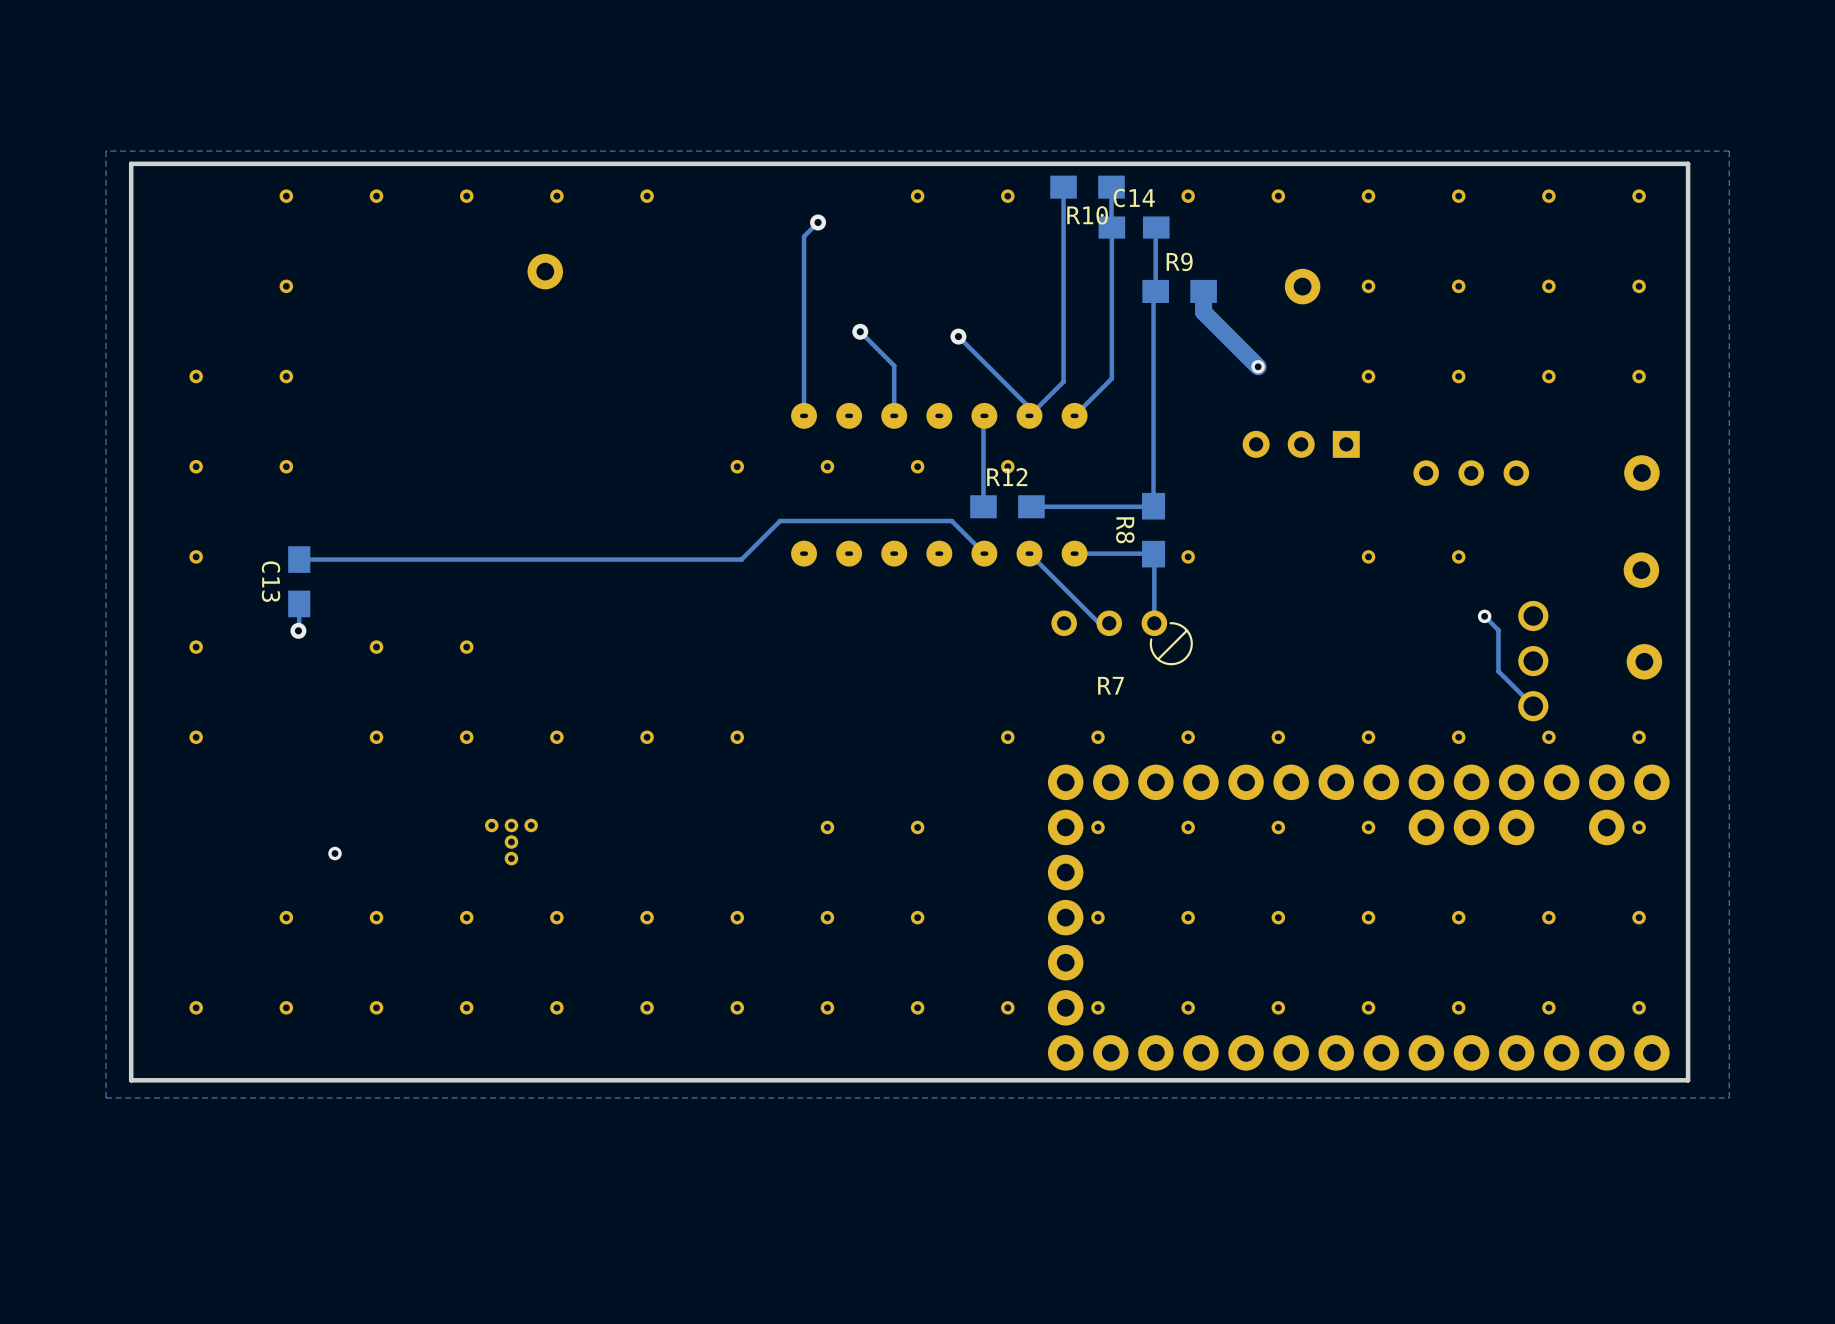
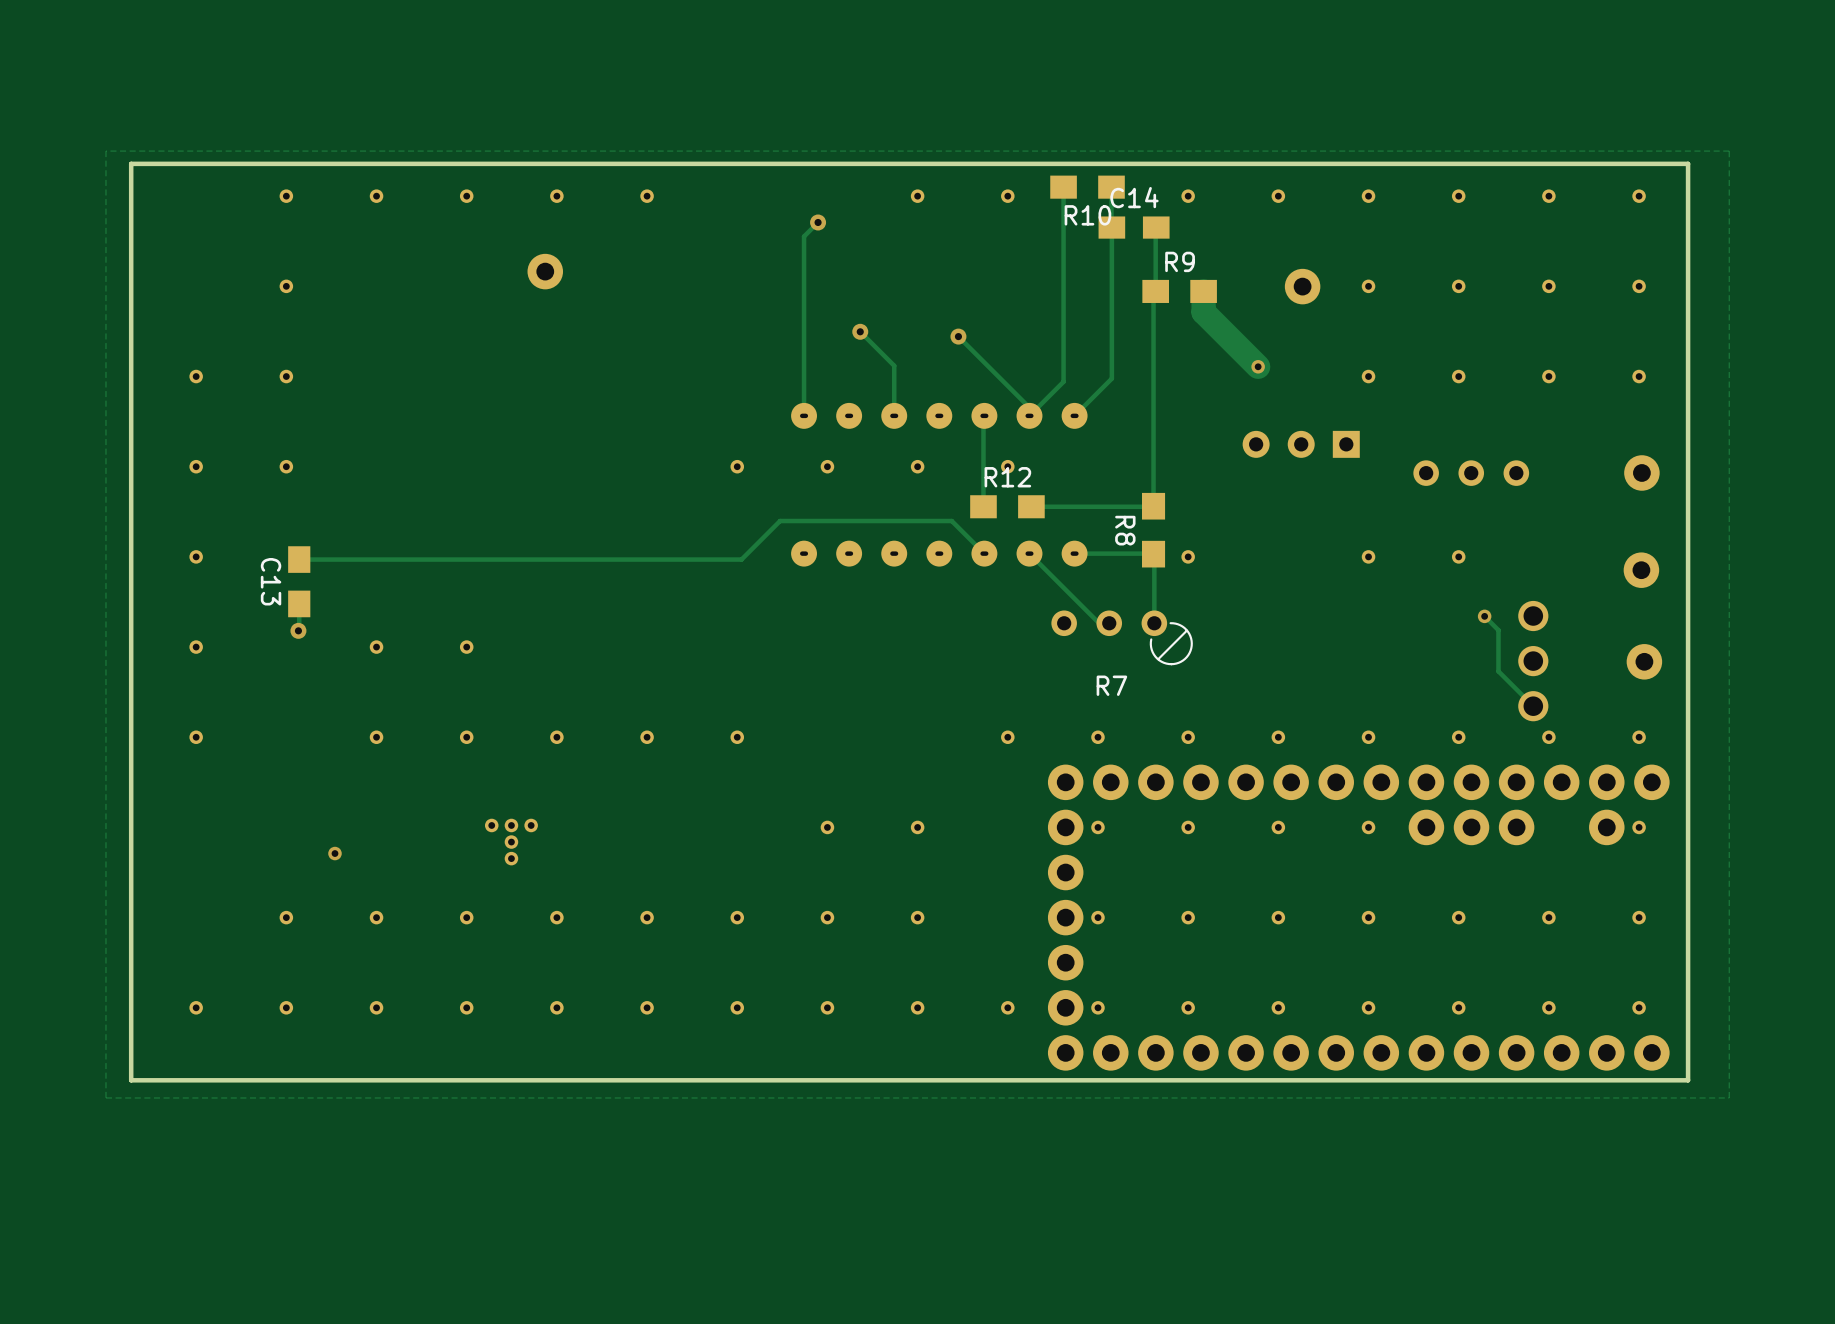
track width: thin (1203, 291) (1203, 312) (1258, 366) -> thick (1203, 291) (1203, 312) (1258, 366)

